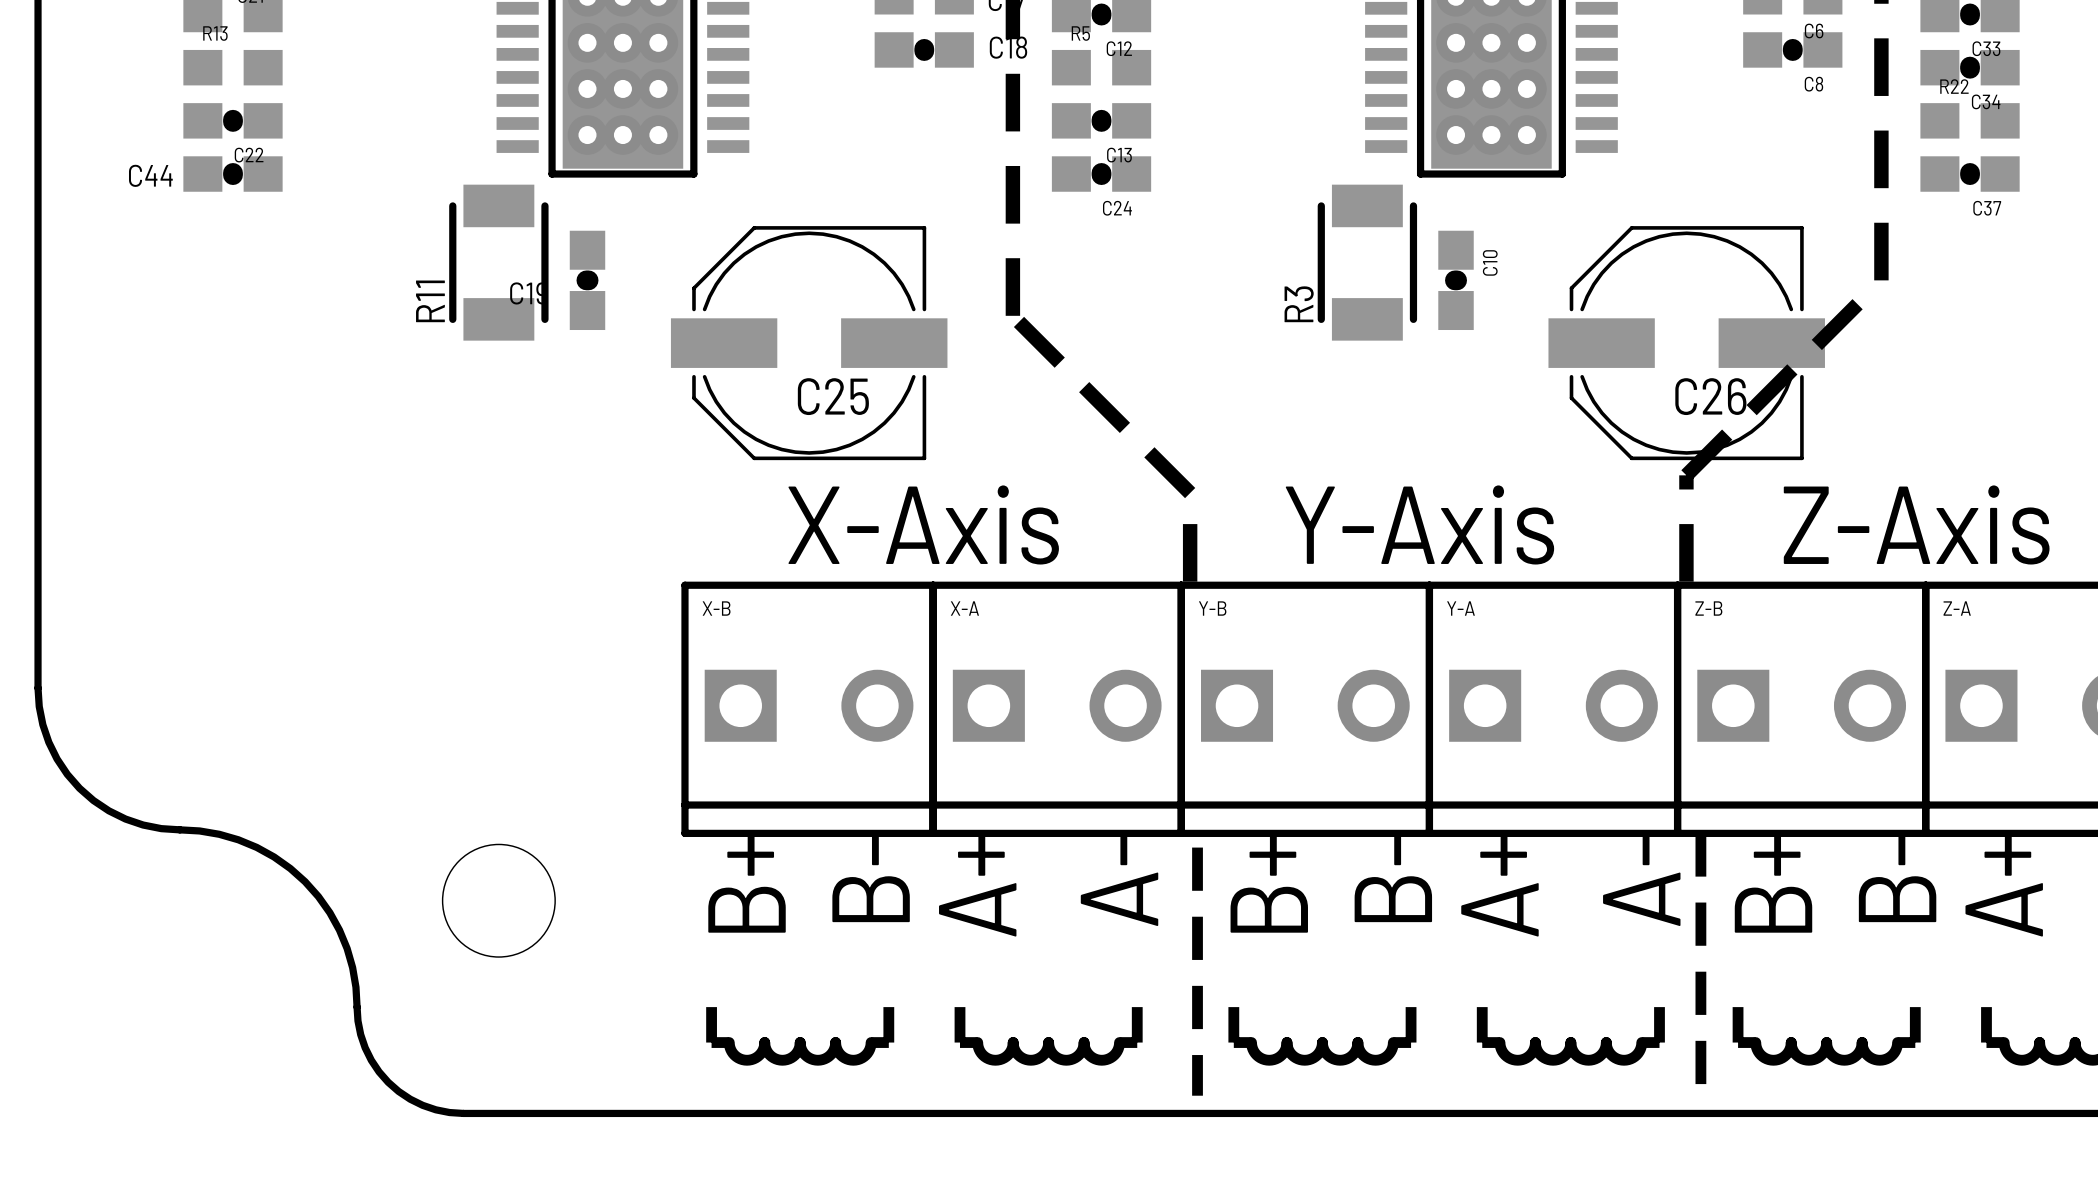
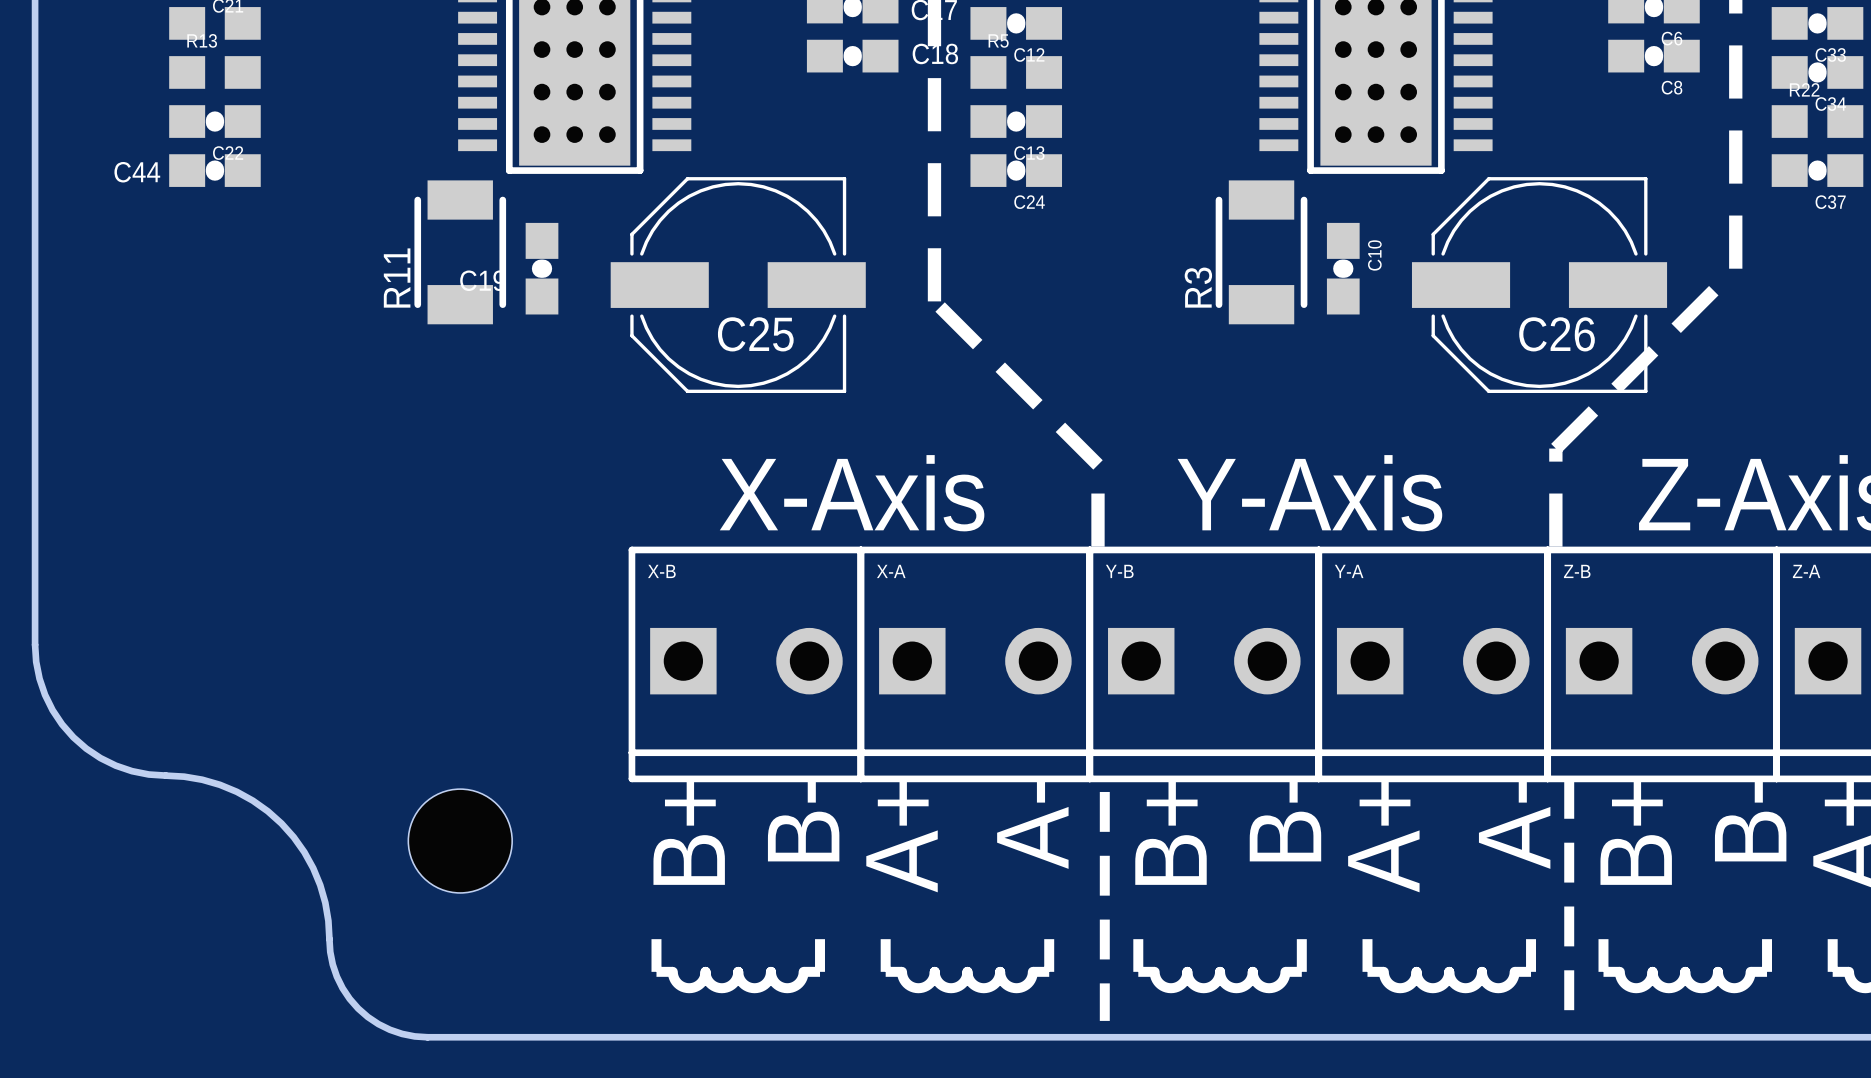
C25 position: (809, 343) -> (738, 285)
C26 position: (1686, 343) -> (1539, 285)

